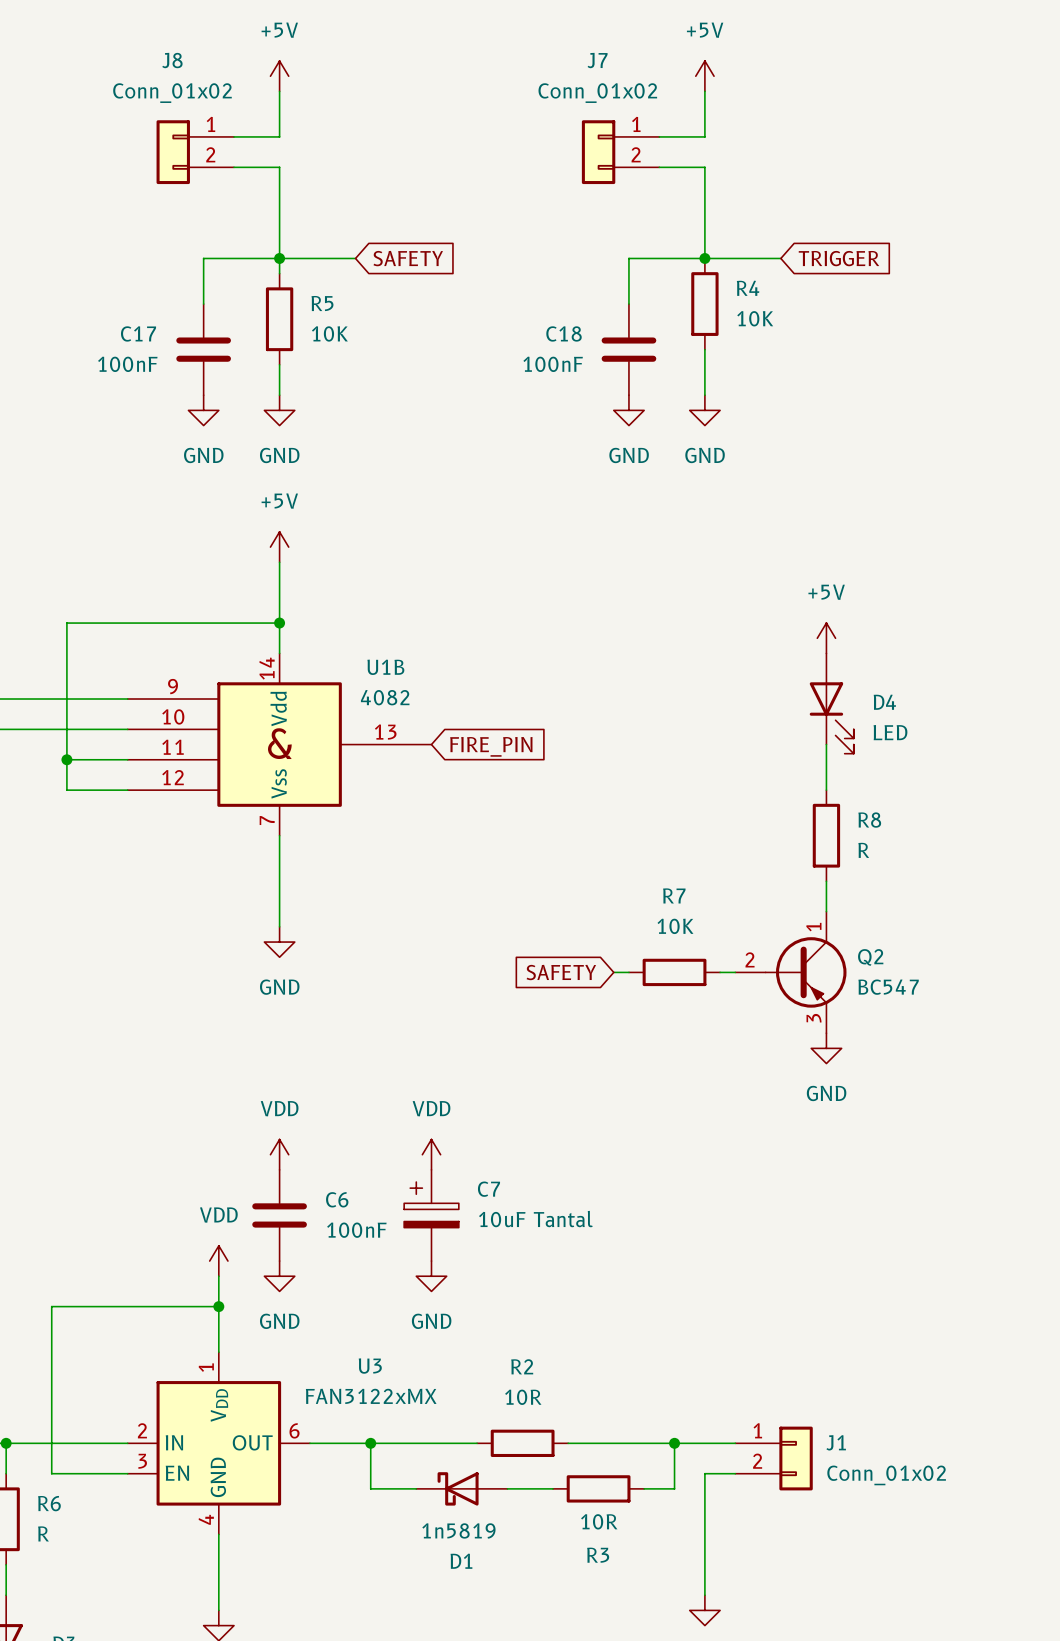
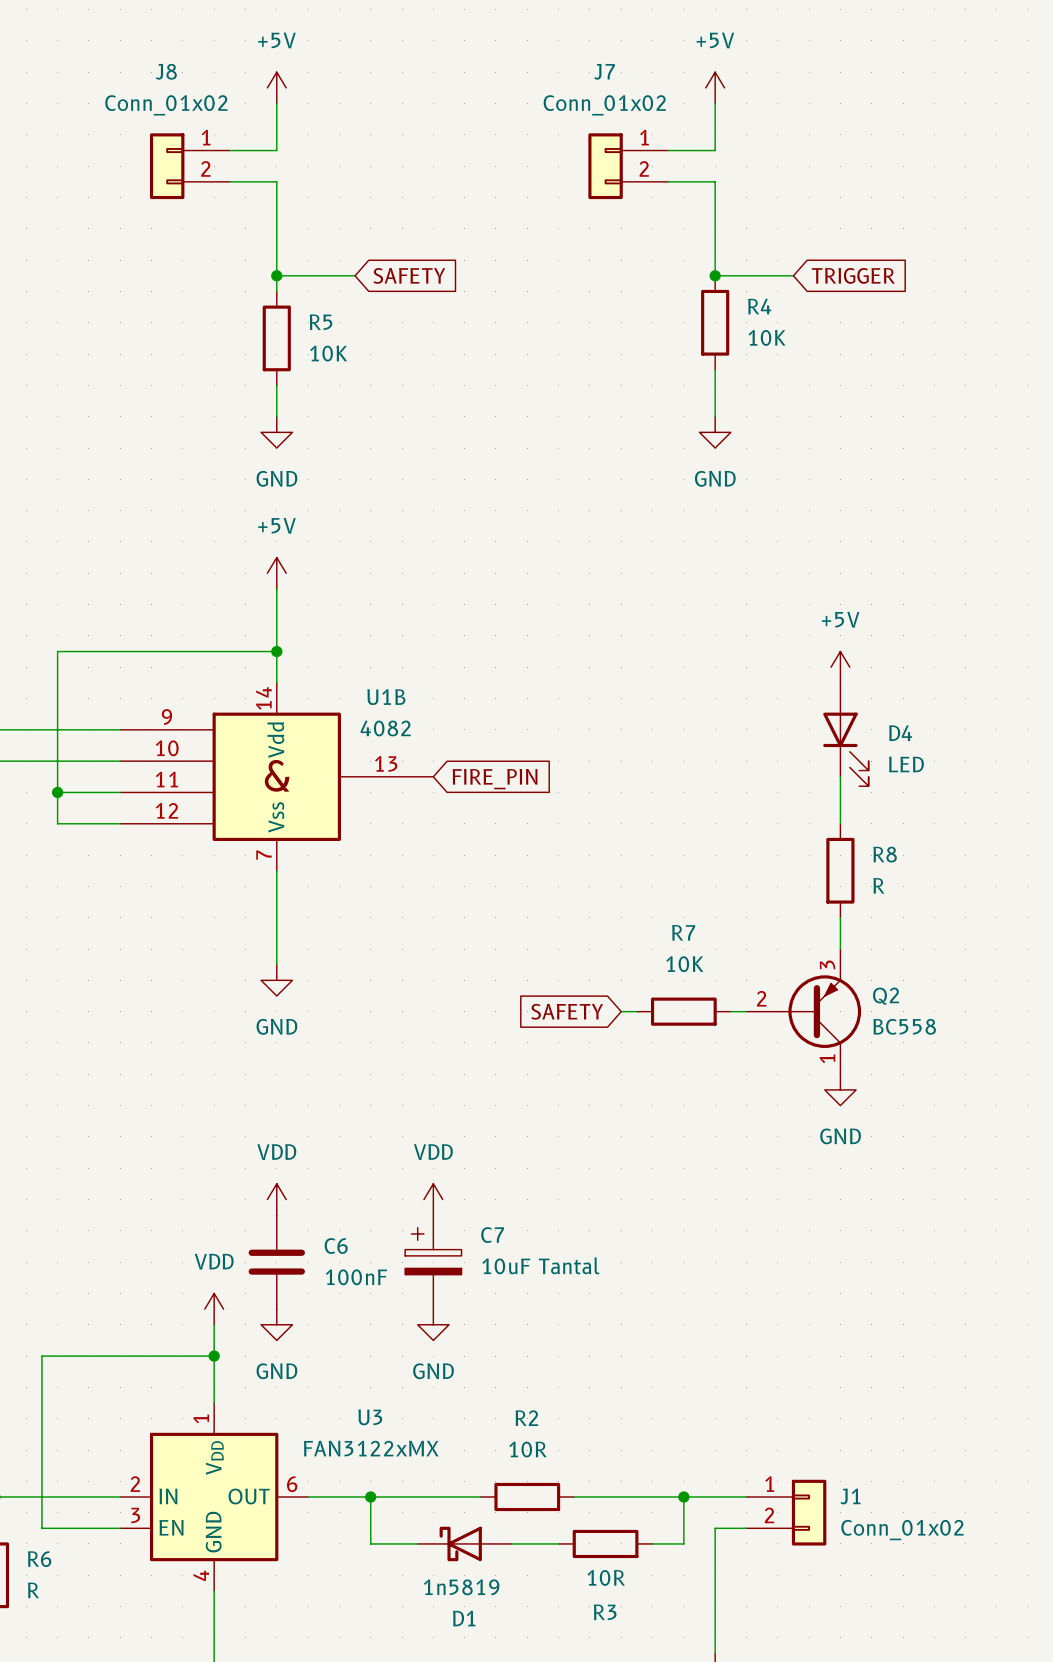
wire: (279, 258) (203, 258) (203, 304) -> none
wire: (704, 258) (628, 258) (628, 304) -> none
C17: 100nF (203, 349) -> none
C18: 100nF (628, 349) -> none
power symbol: GND (203, 410) -> none
power symbol: GND (628, 410) -> none
Q2 flip: as is (806, 972) -> up-down (819, 1011)
Q2 value: BC547 (888, 987) -> BC558 (904, 1026)

